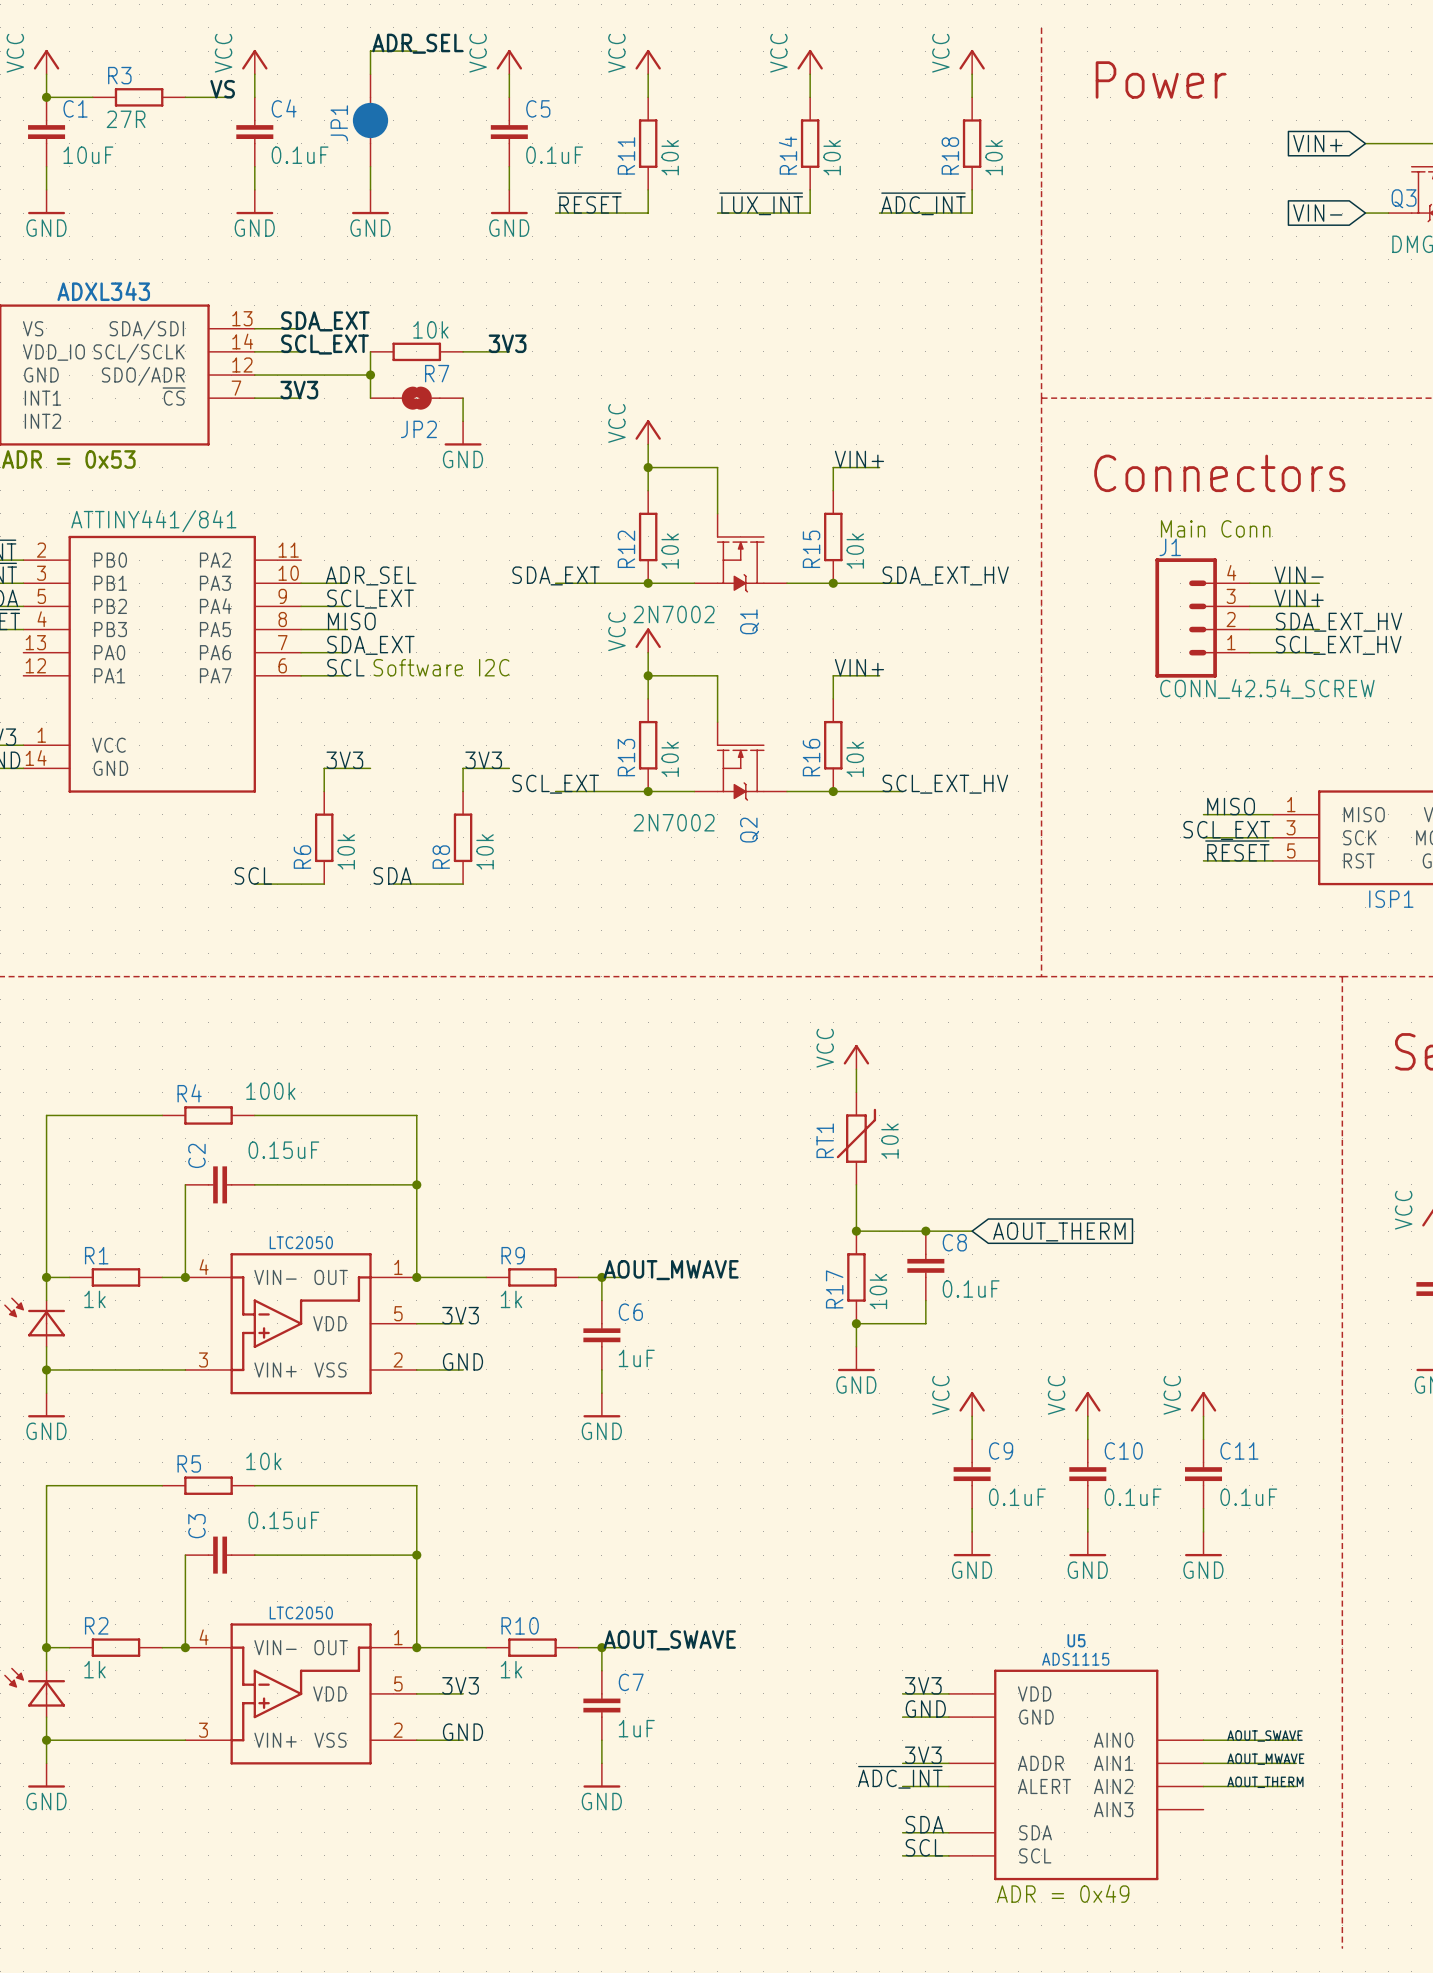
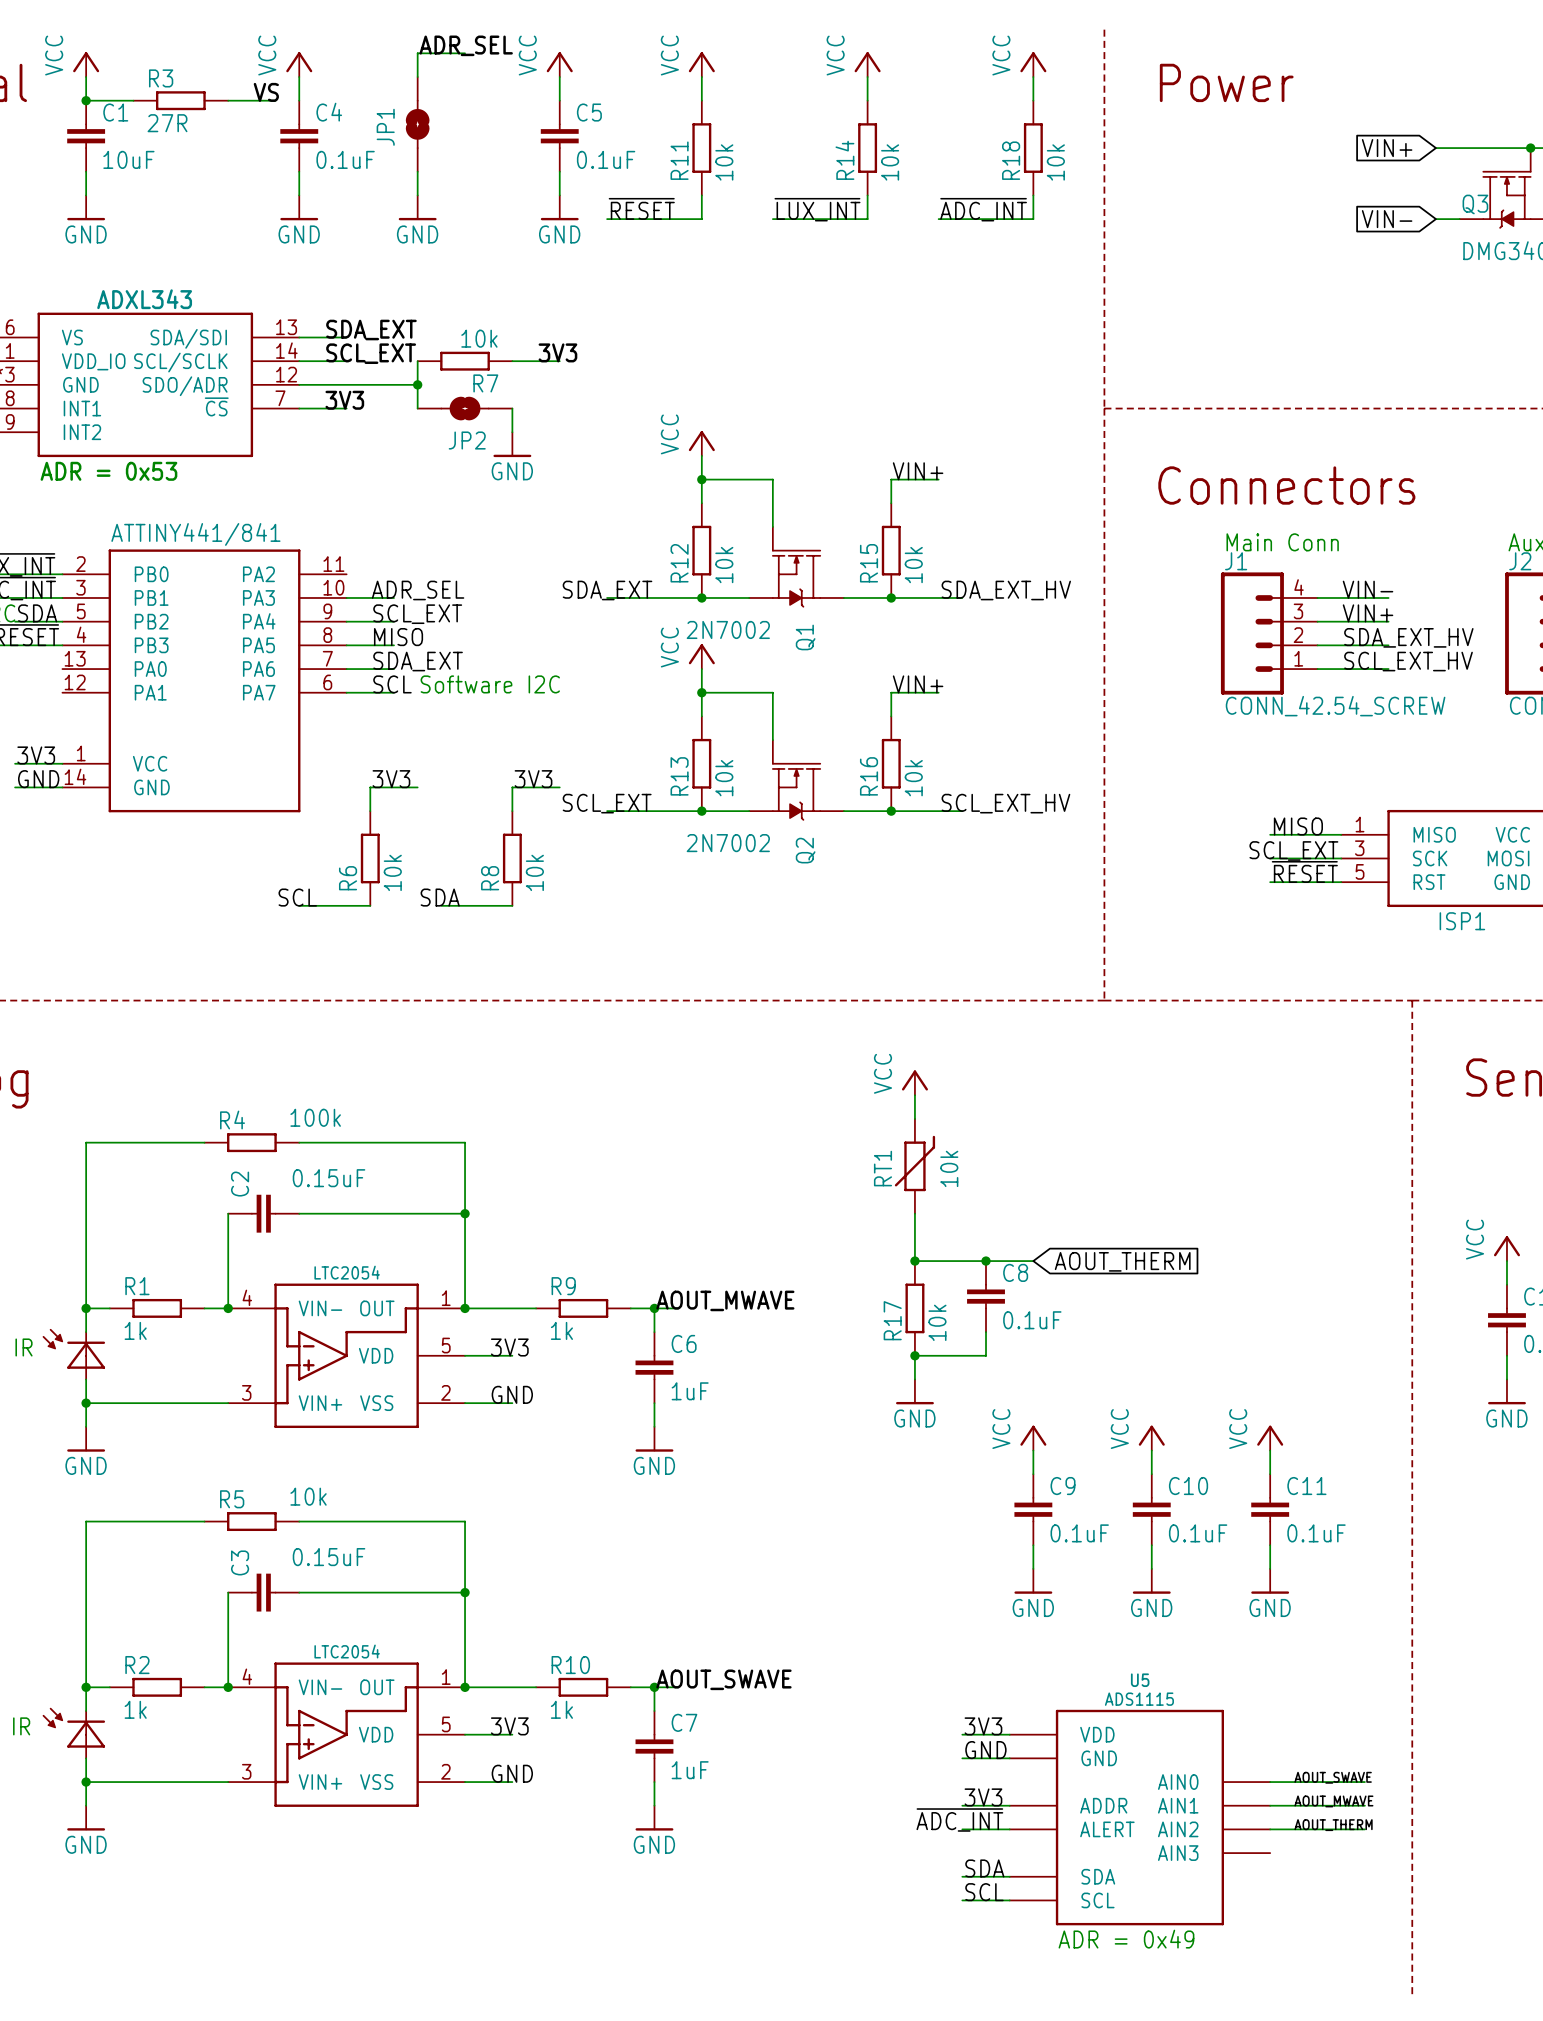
JP1 symbol: [352, 74, 389, 167] -> [405, 77, 430, 172]
part text: LTC2050 (301, 1242) -> LTC2054 (347, 1272)
part text: LTC2050 (301, 1612) -> LTC2054 (347, 1651)

